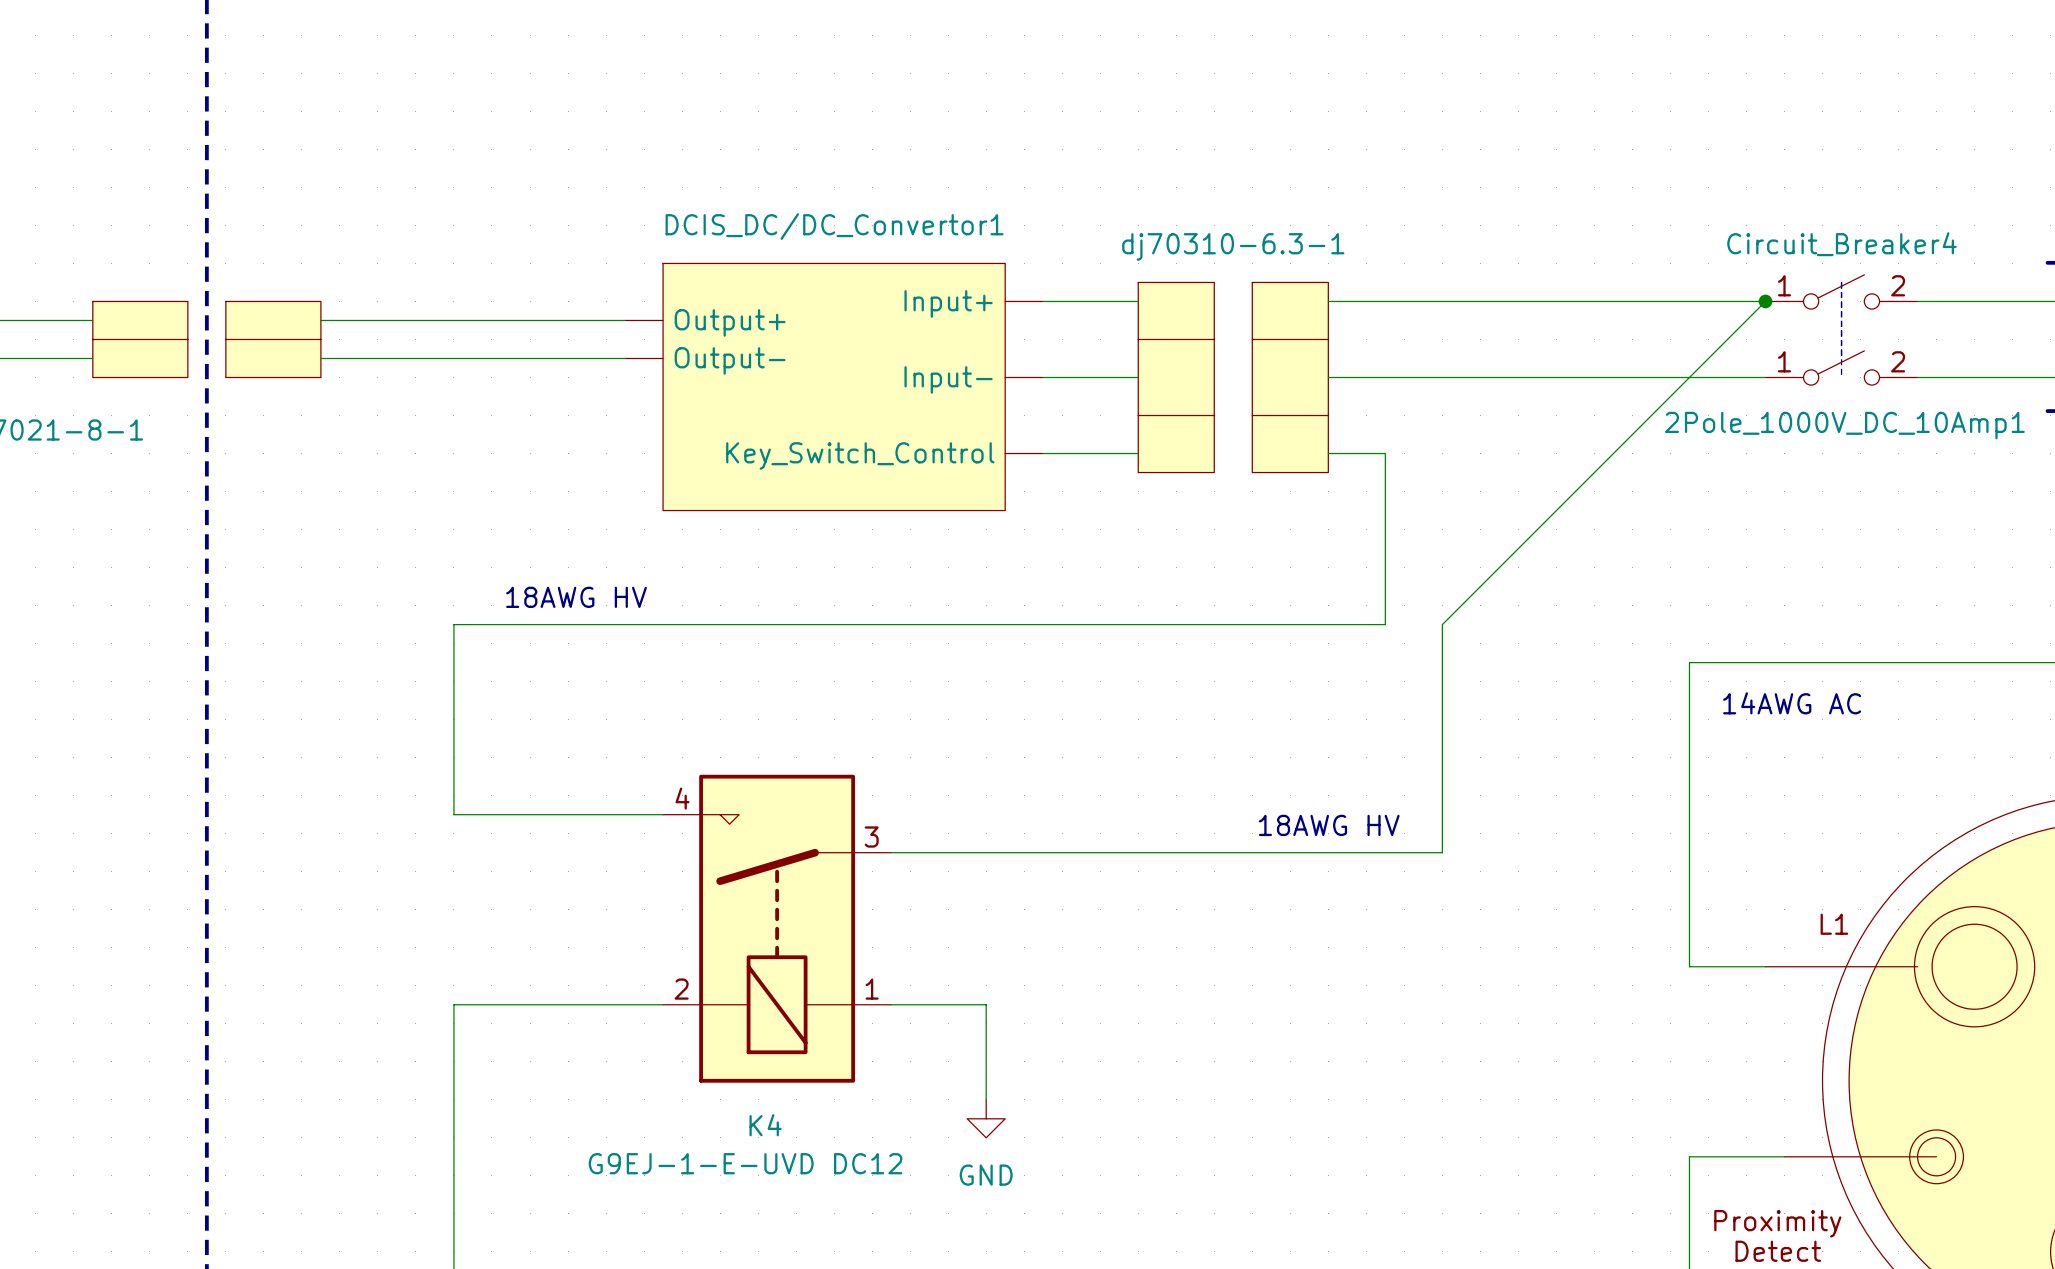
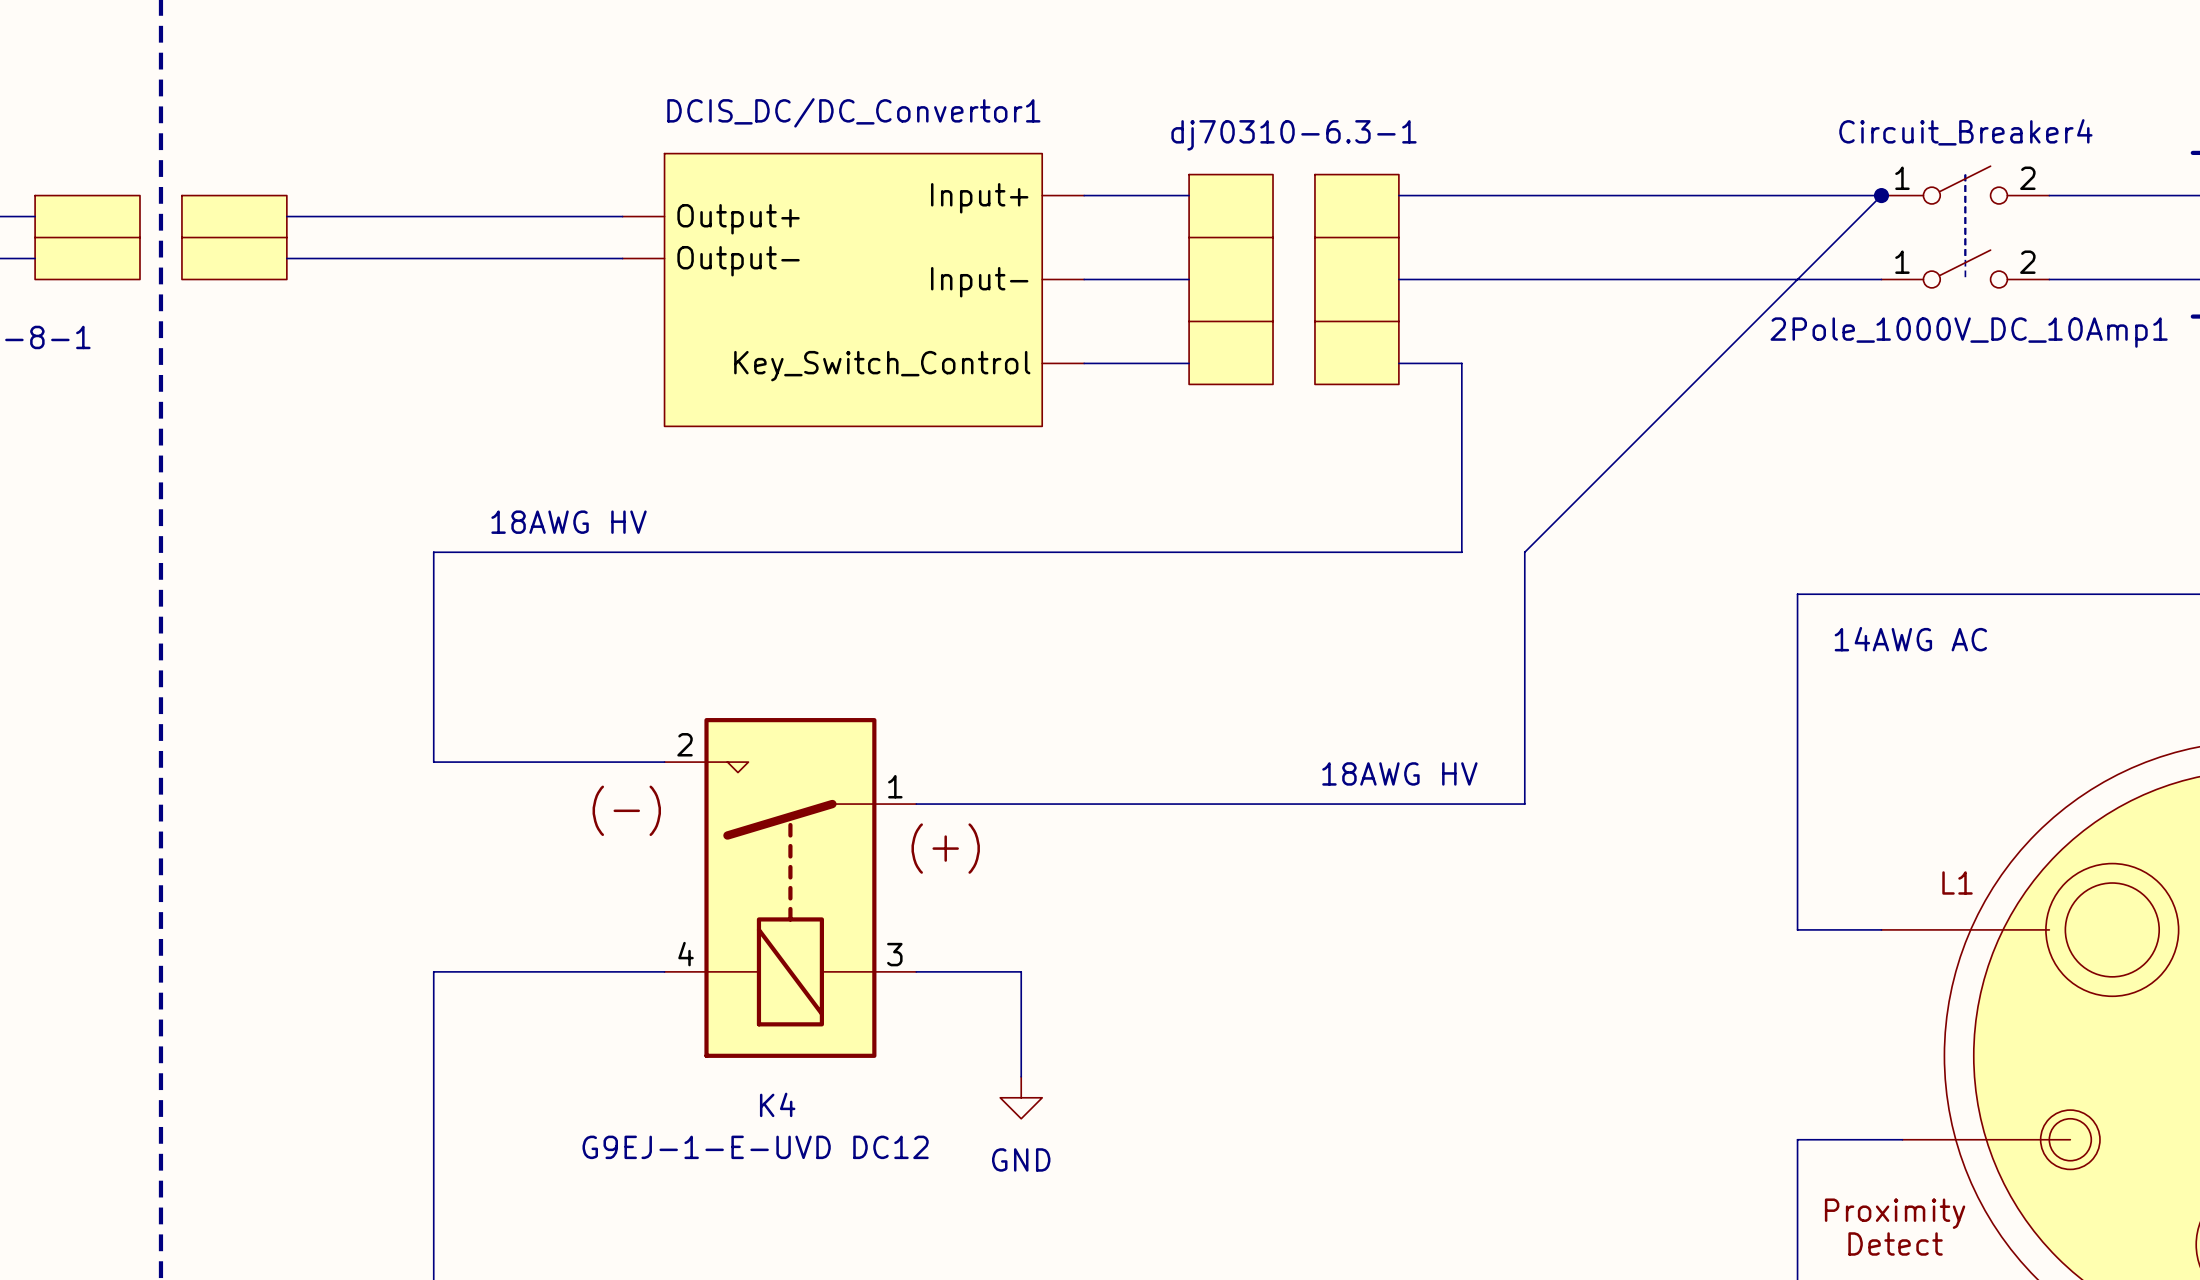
K4 pin number: 4 (682, 798) -> 2 (685, 744)
K4 pin number: 3 (871, 837) -> 1 (895, 786)
K4 text: none -> (-) (626, 810)
K4 text: none -> (+) (945, 848)
K4 pin number: 2 (681, 989) -> 4 (686, 954)
K4 pin number: 1 (872, 989) -> 3 (894, 954)

